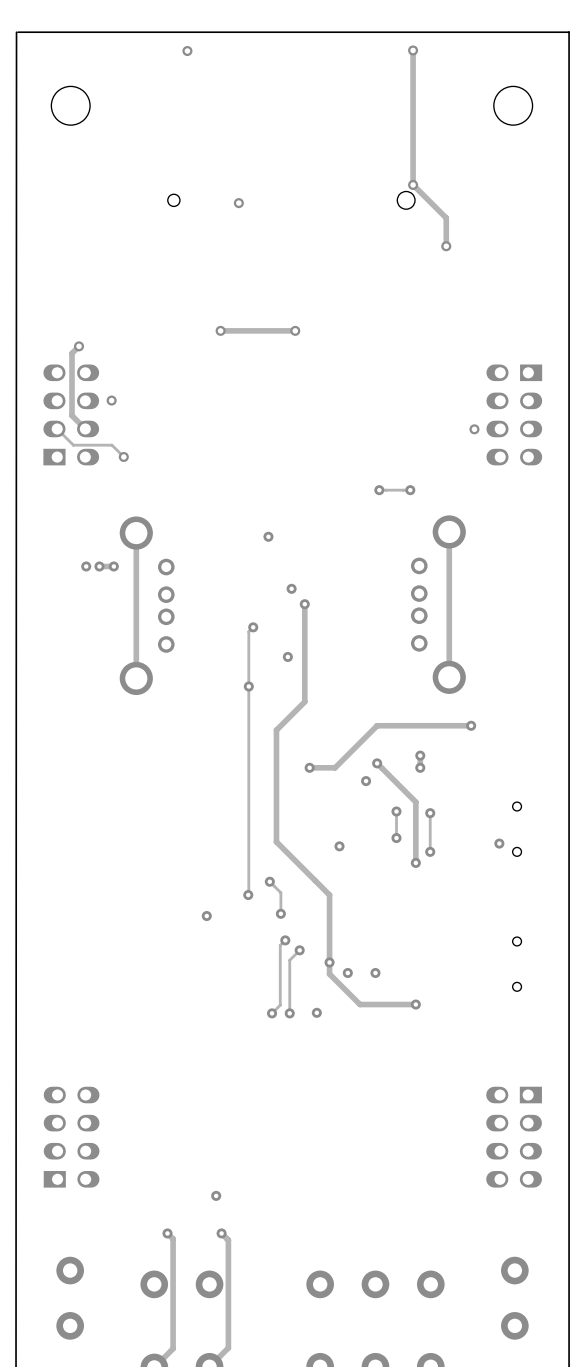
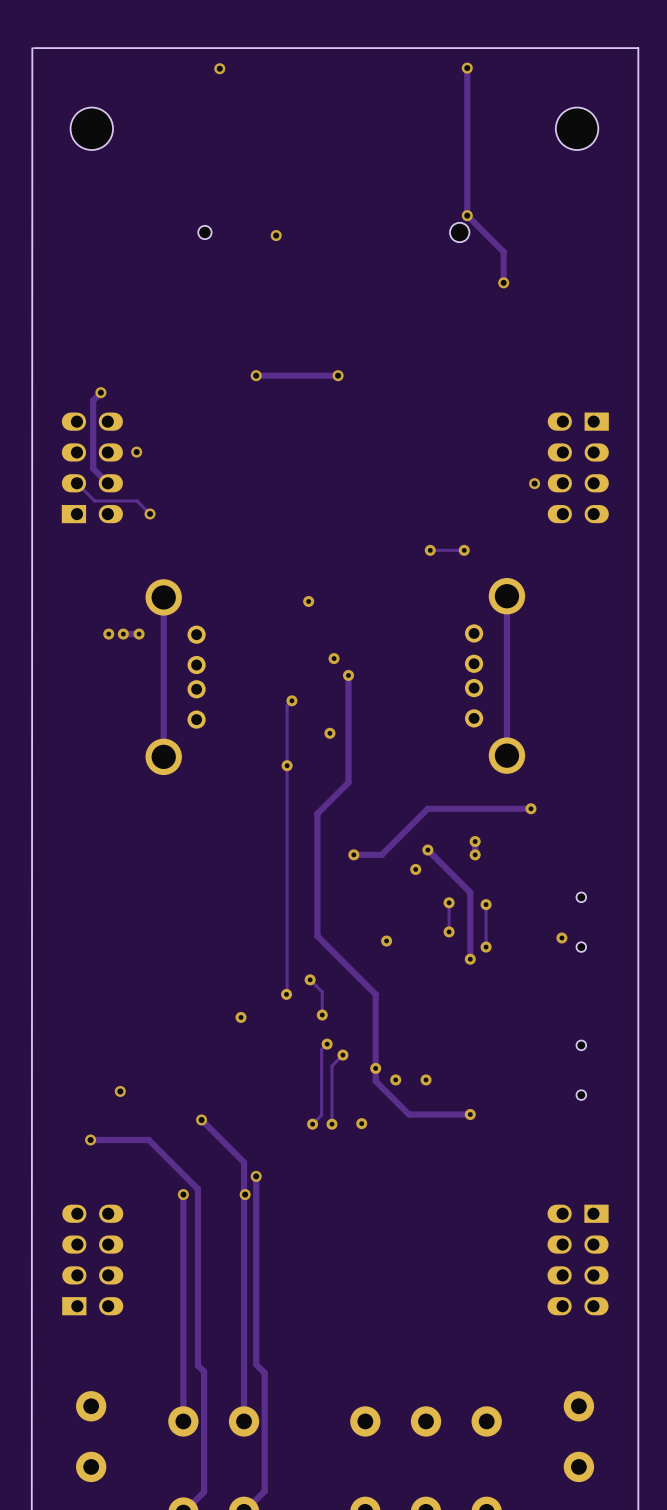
via: none -> (120, 1091)
track: none -> (201, 1119) (244, 1162) (244, 1421)
via: none -> (201, 1119)
track: none -> (90, 1139) (148, 1139) (197, 1189) (197, 1365)
via: none -> (90, 1139)
track: none -> (256, 1176) (257, 1365)
via: none -> (256, 1176)
track: none -> (183, 1194) (183, 1421)
via: none -> (183, 1194)
via: none -> (245, 1194)
via: (216, 1195) -> none
via: (167, 1233) -> none
via: (221, 1233) -> none

